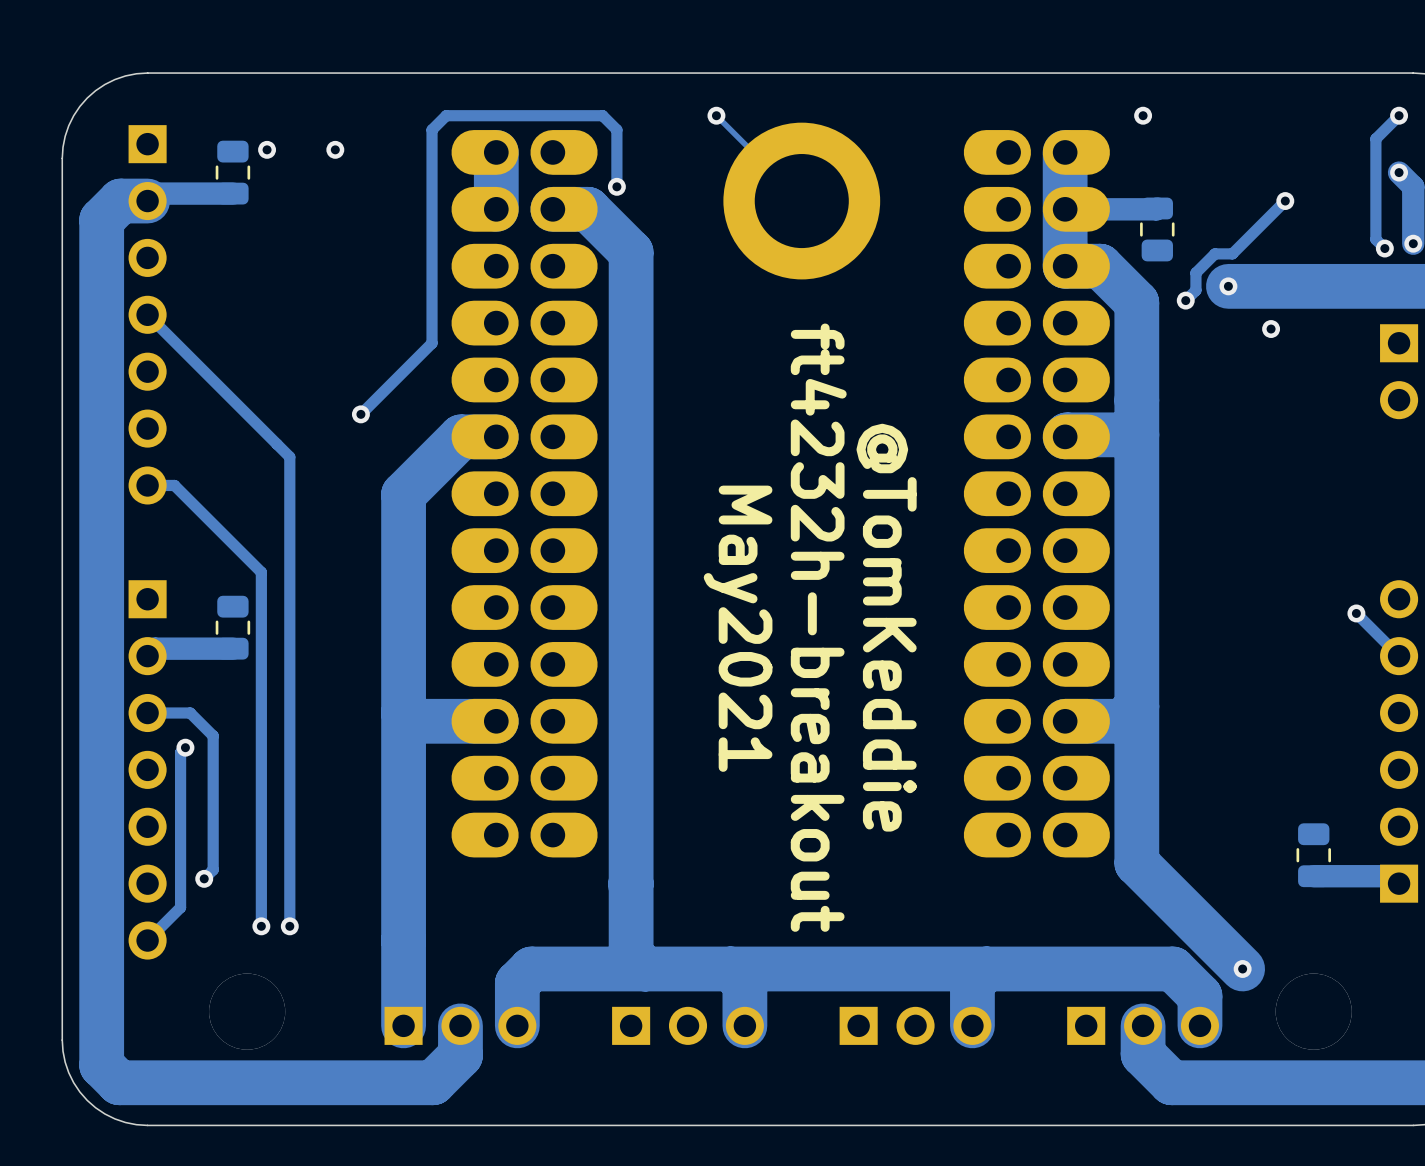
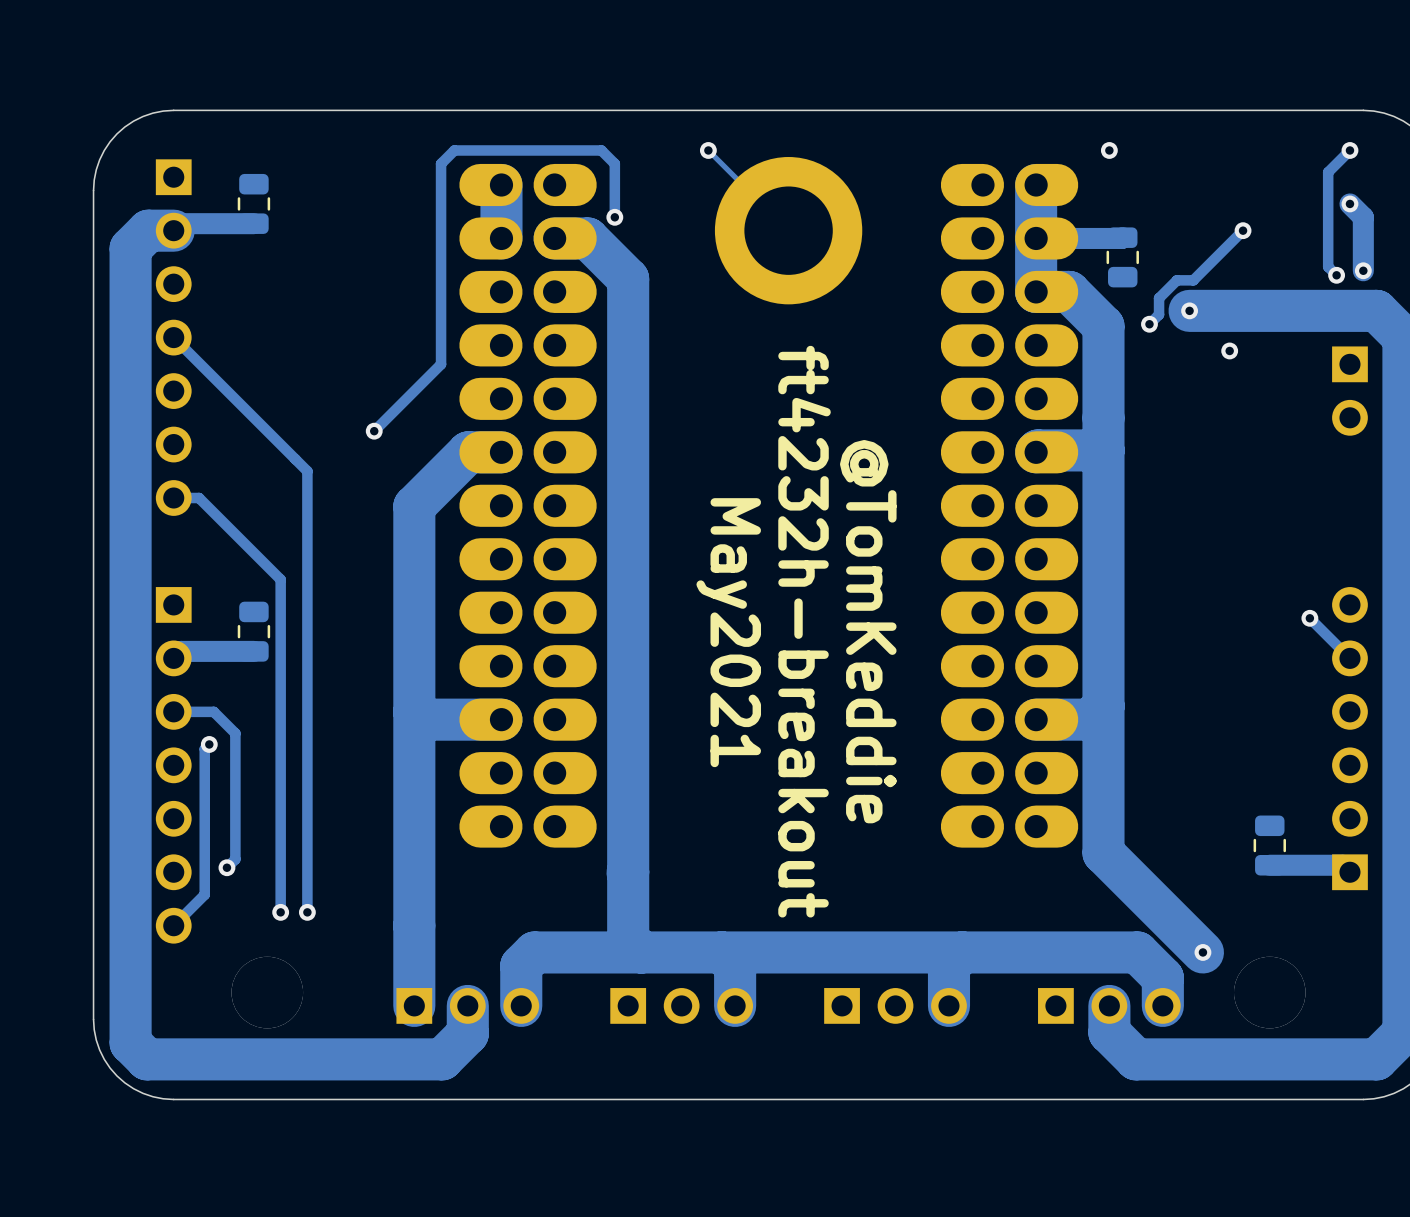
via: (267, 149) -> none
via: (335, 149) -> none

